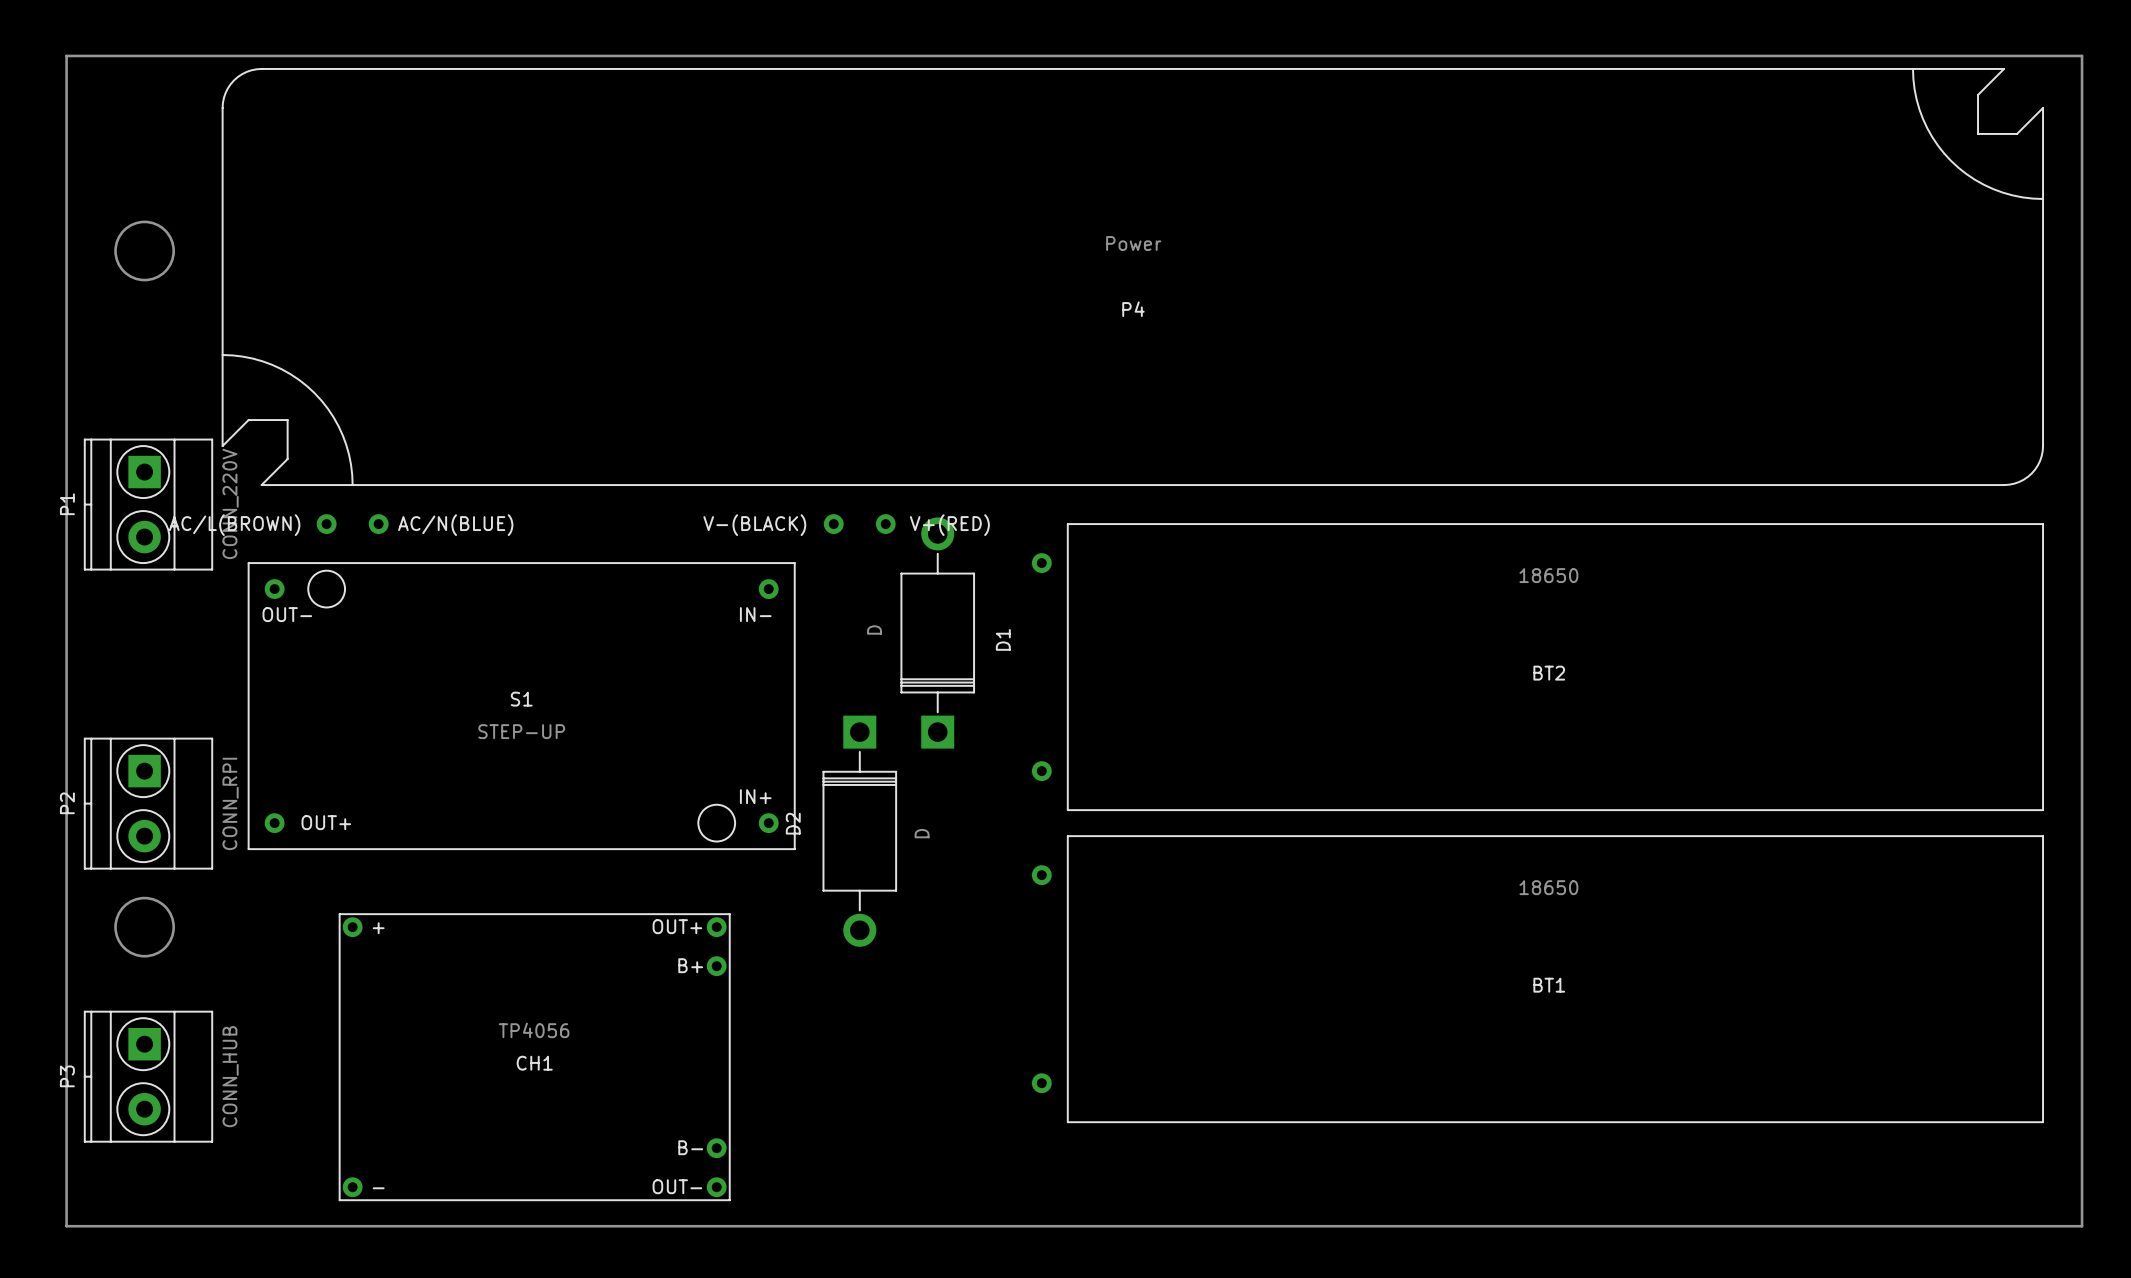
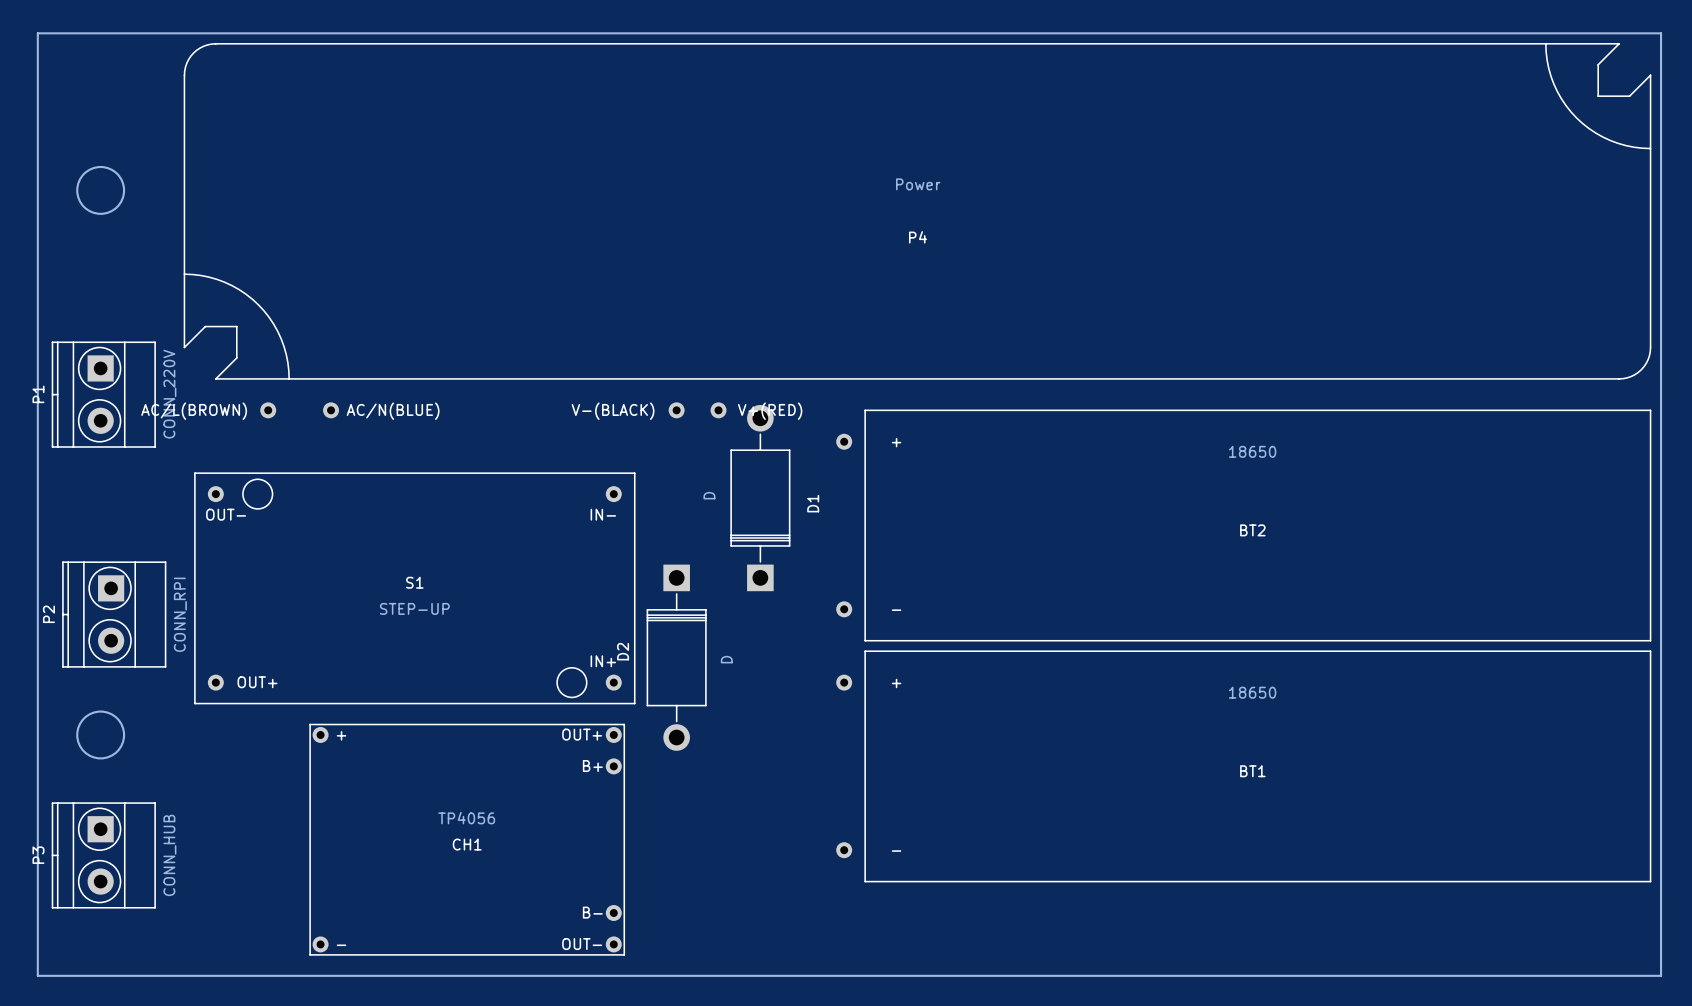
P4 footprint: [221, 67, 2045, 534] -> [183, 43, 1652, 419]
BT2 text: none -> + (896, 442)
D1 position: (937, 633) -> (760, 498)
BT2 position: (1537, 667) -> (1243, 525)
S1 position: (521, 706) -> (414, 588)
BT2 text: none -> - (896, 610)
P2 position: (148, 803) -> (114, 614)
BT1 text: none -> + (896, 683)
BT1 position: (1537, 979) -> (1243, 766)
CH1 position: (534, 1057) -> (467, 839)
BT1 text: none -> - (896, 851)

